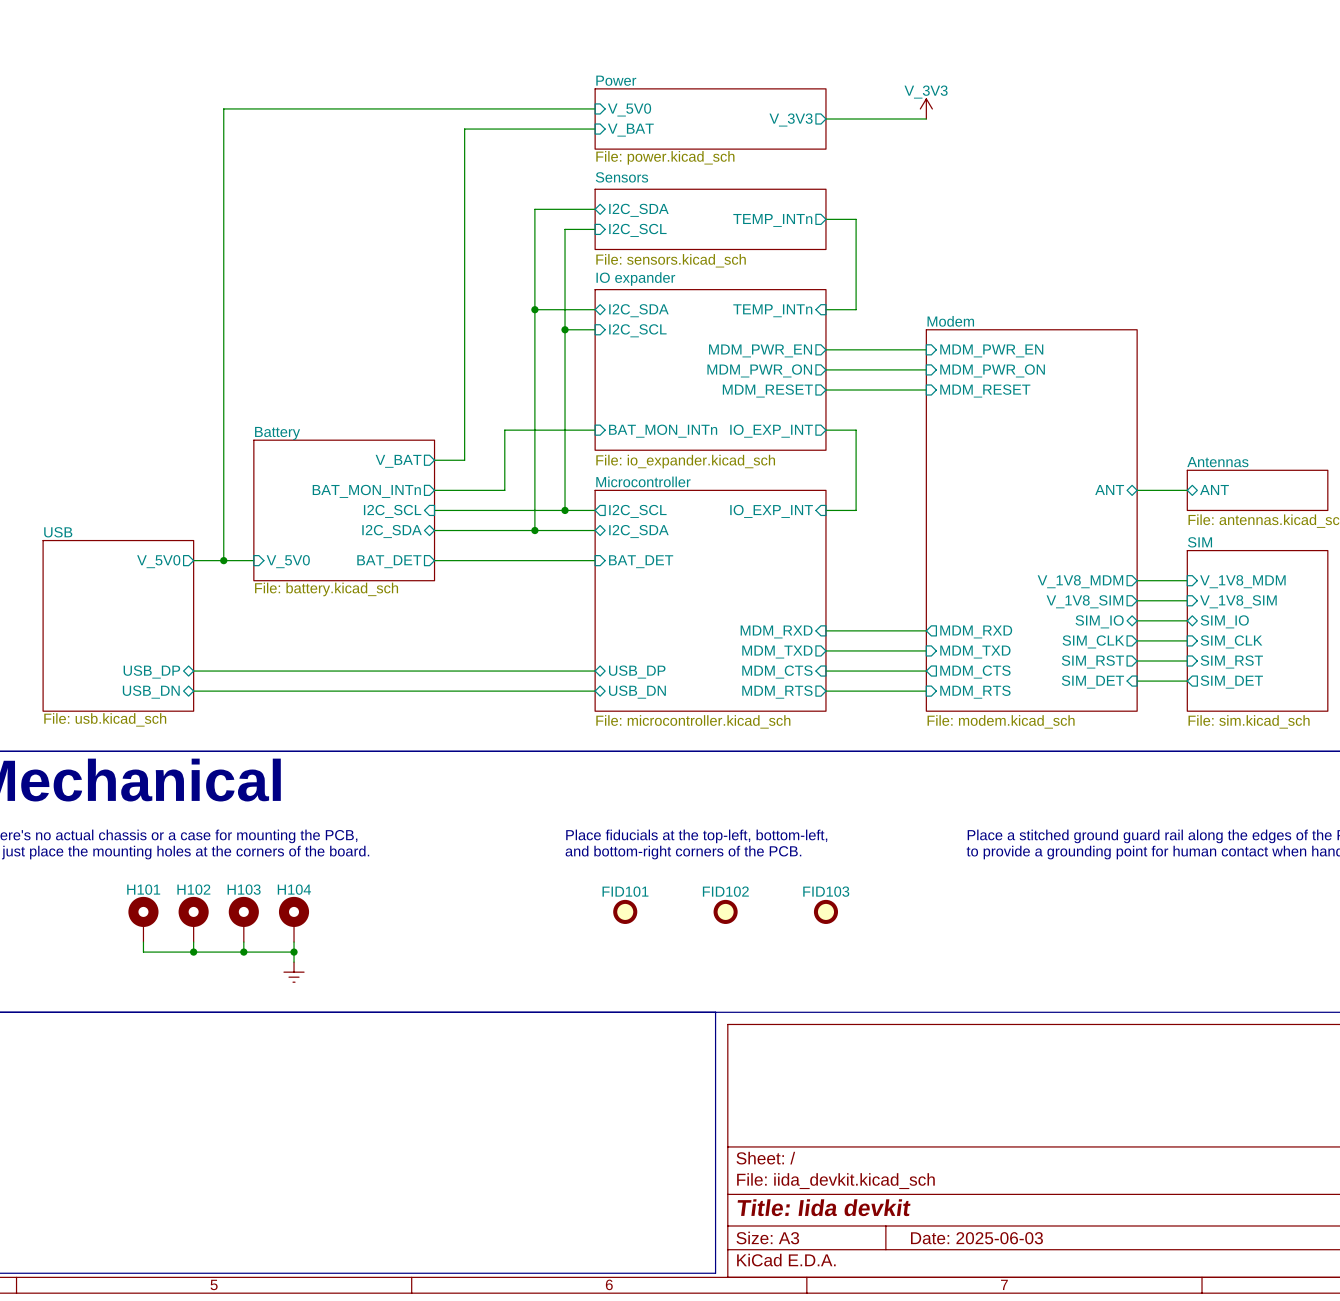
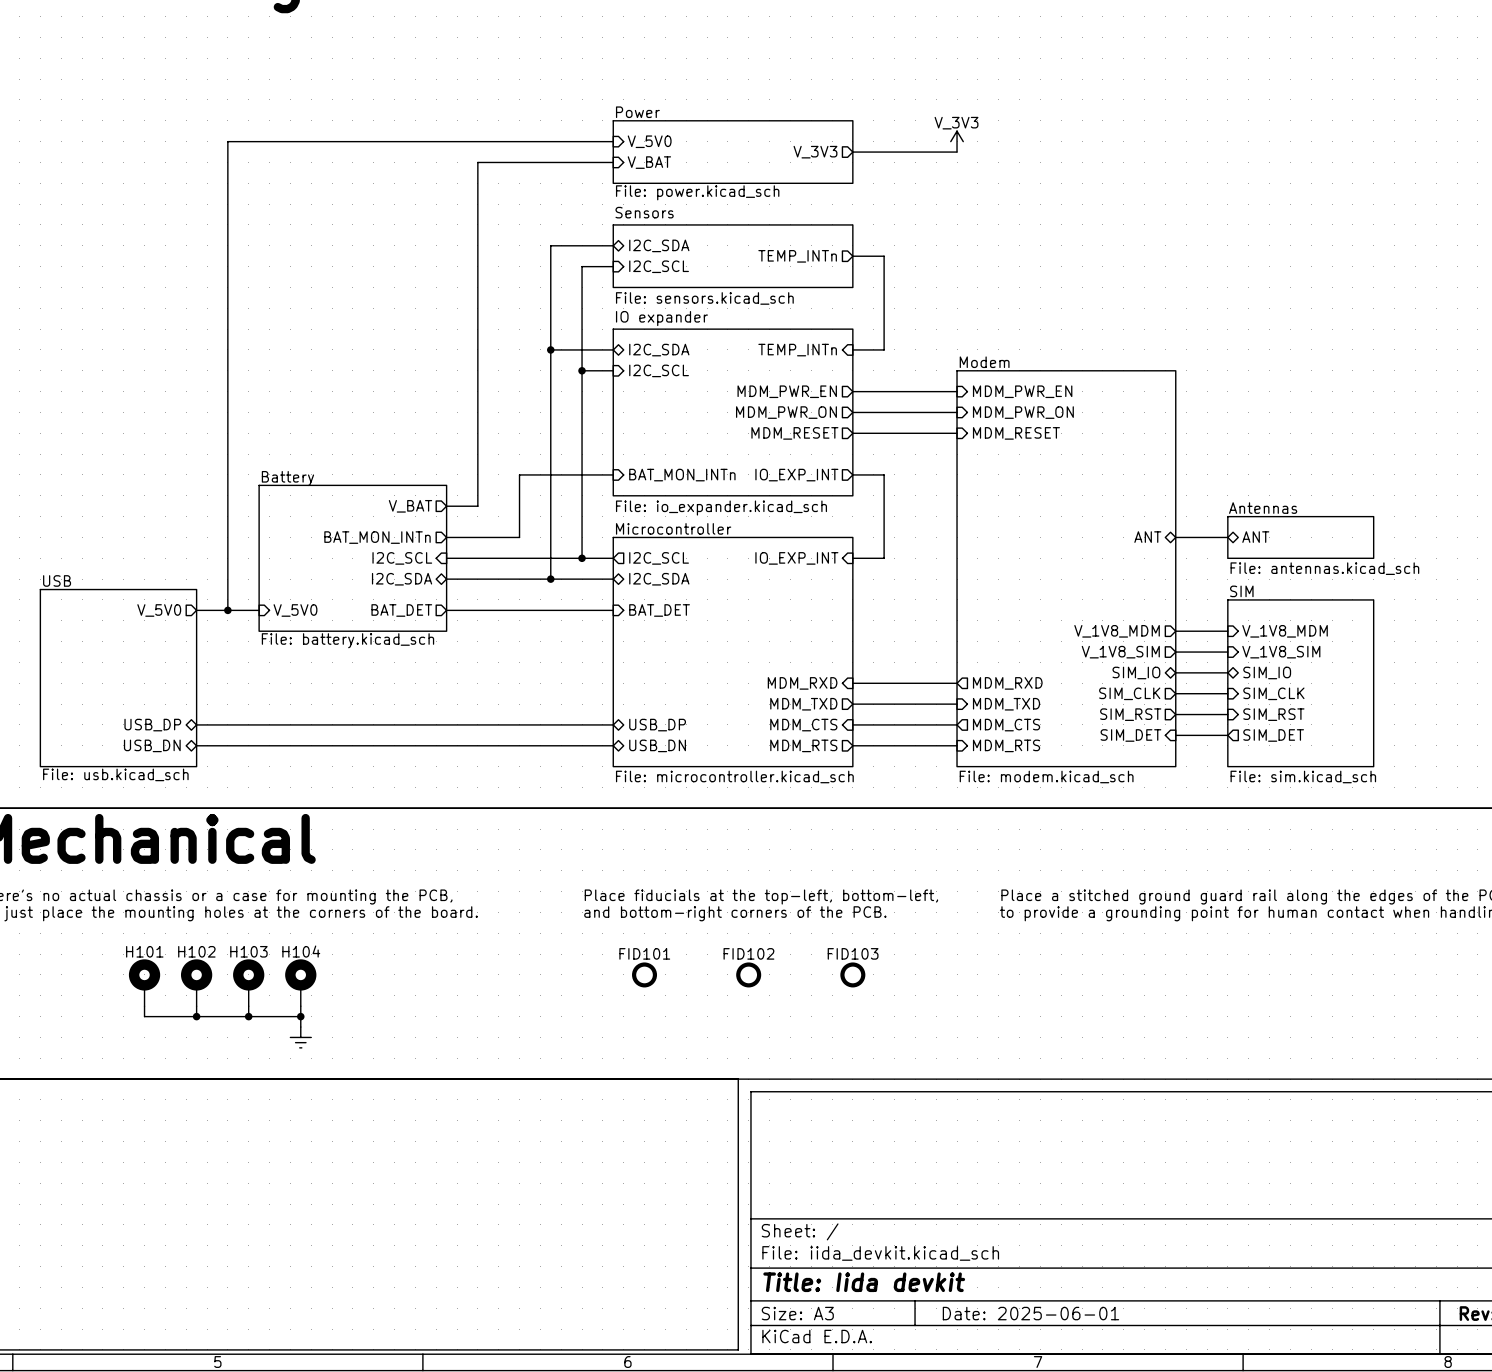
title block: Date: 2025-06-03 (976, 1238) -> Date: 2025-06-01 (1030, 1313)

